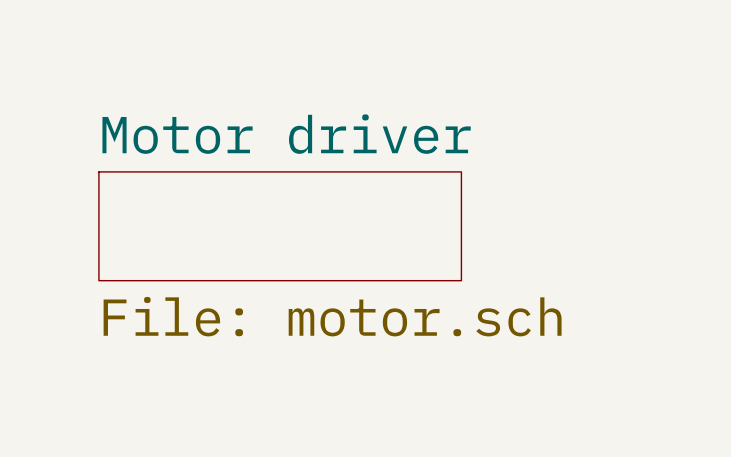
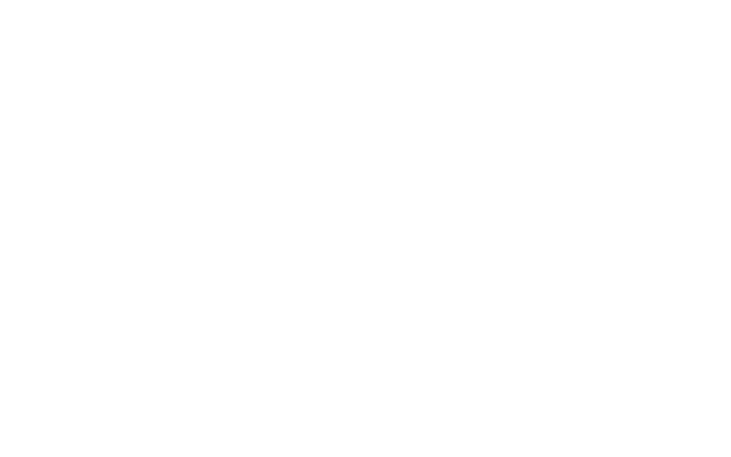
sheet Motor driver: File: motor.sch (280, 226) -> none

